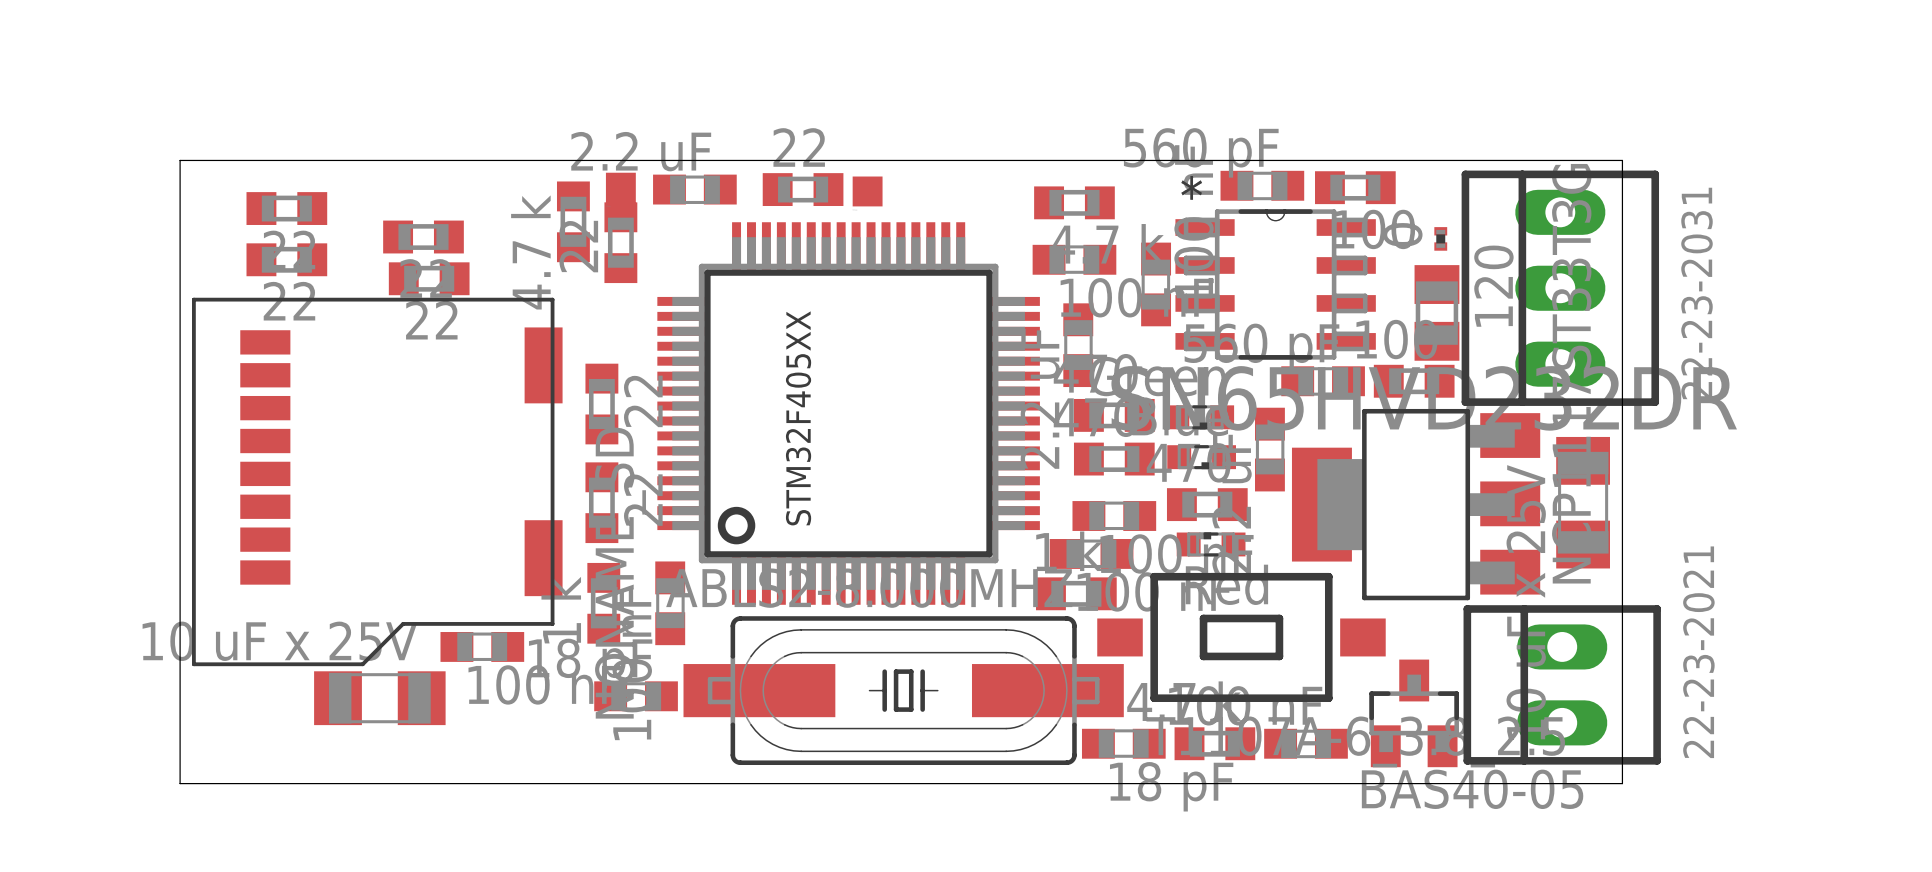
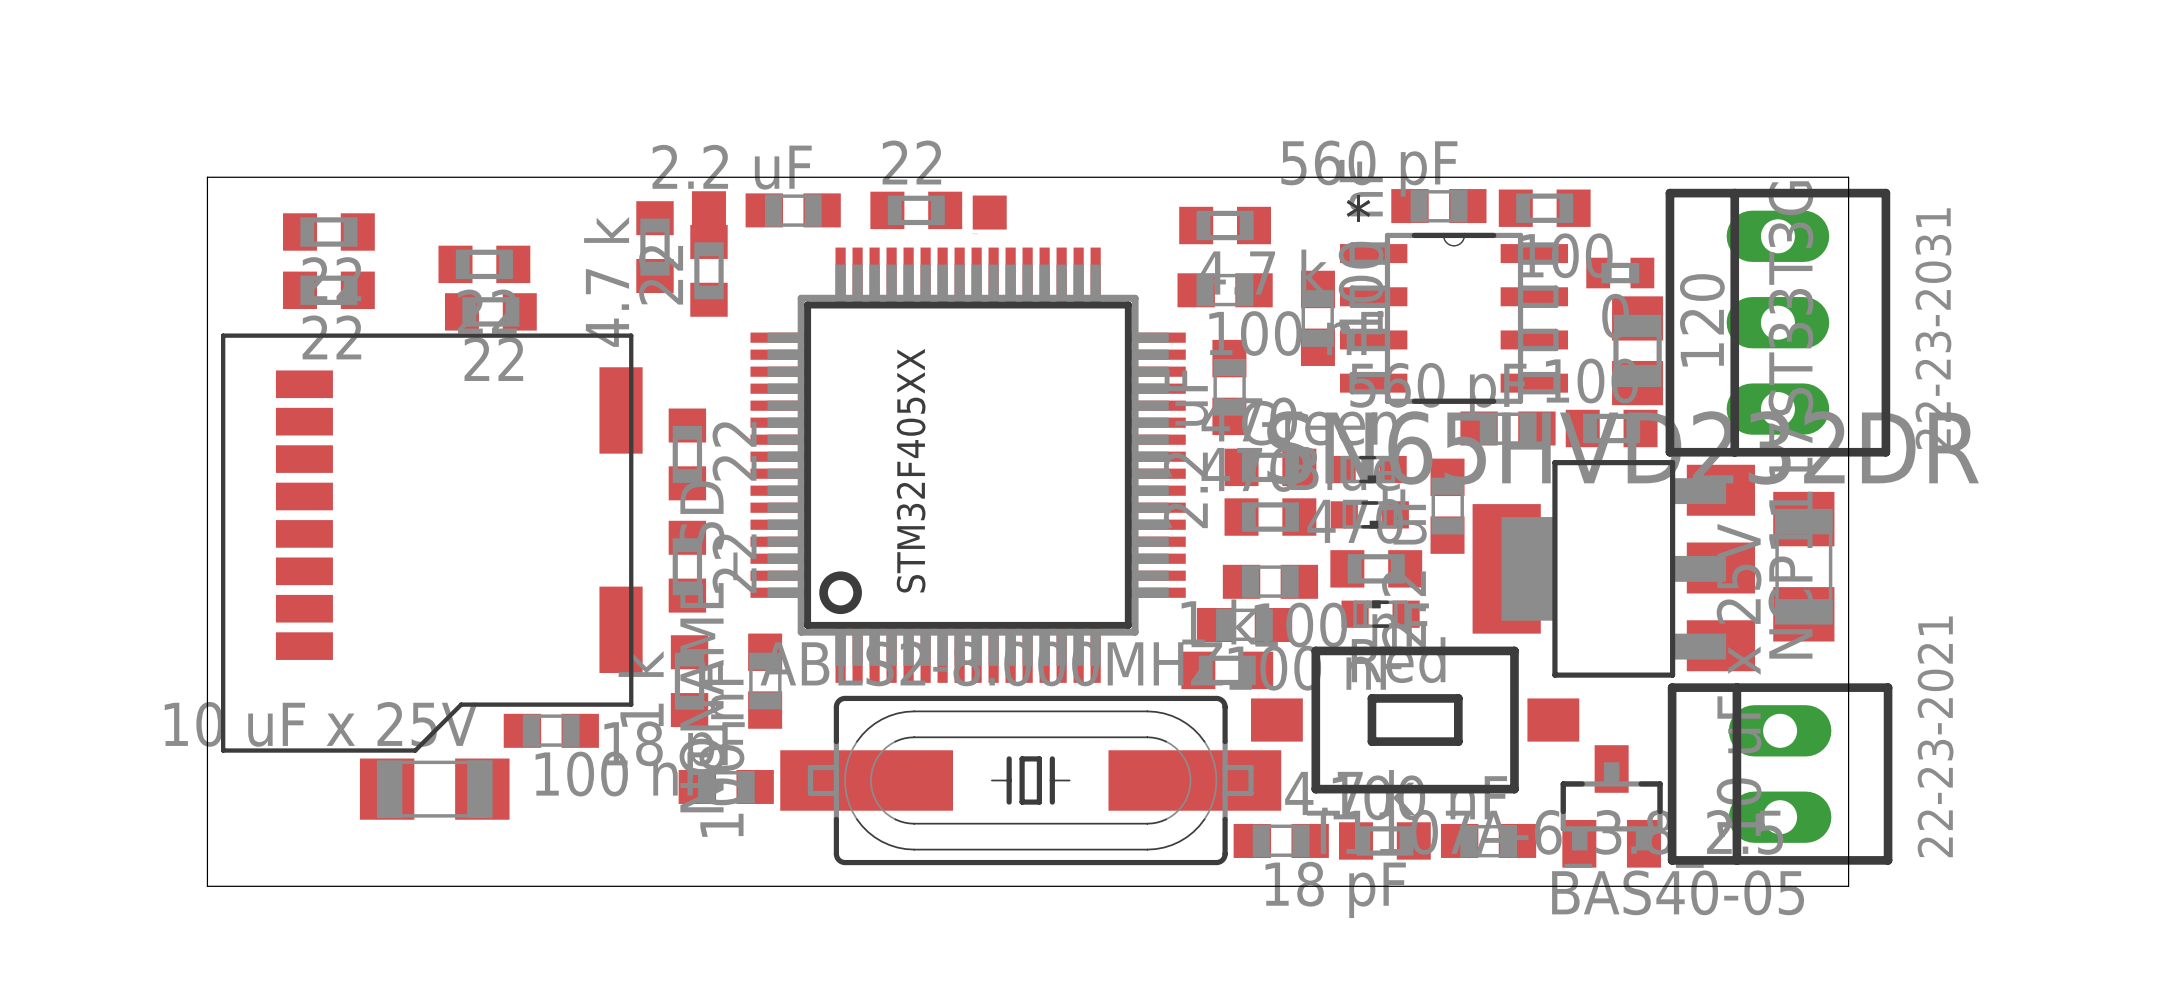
part footprint: [1434, 227, 1448, 251] -> [1586, 257, 1655, 289]

